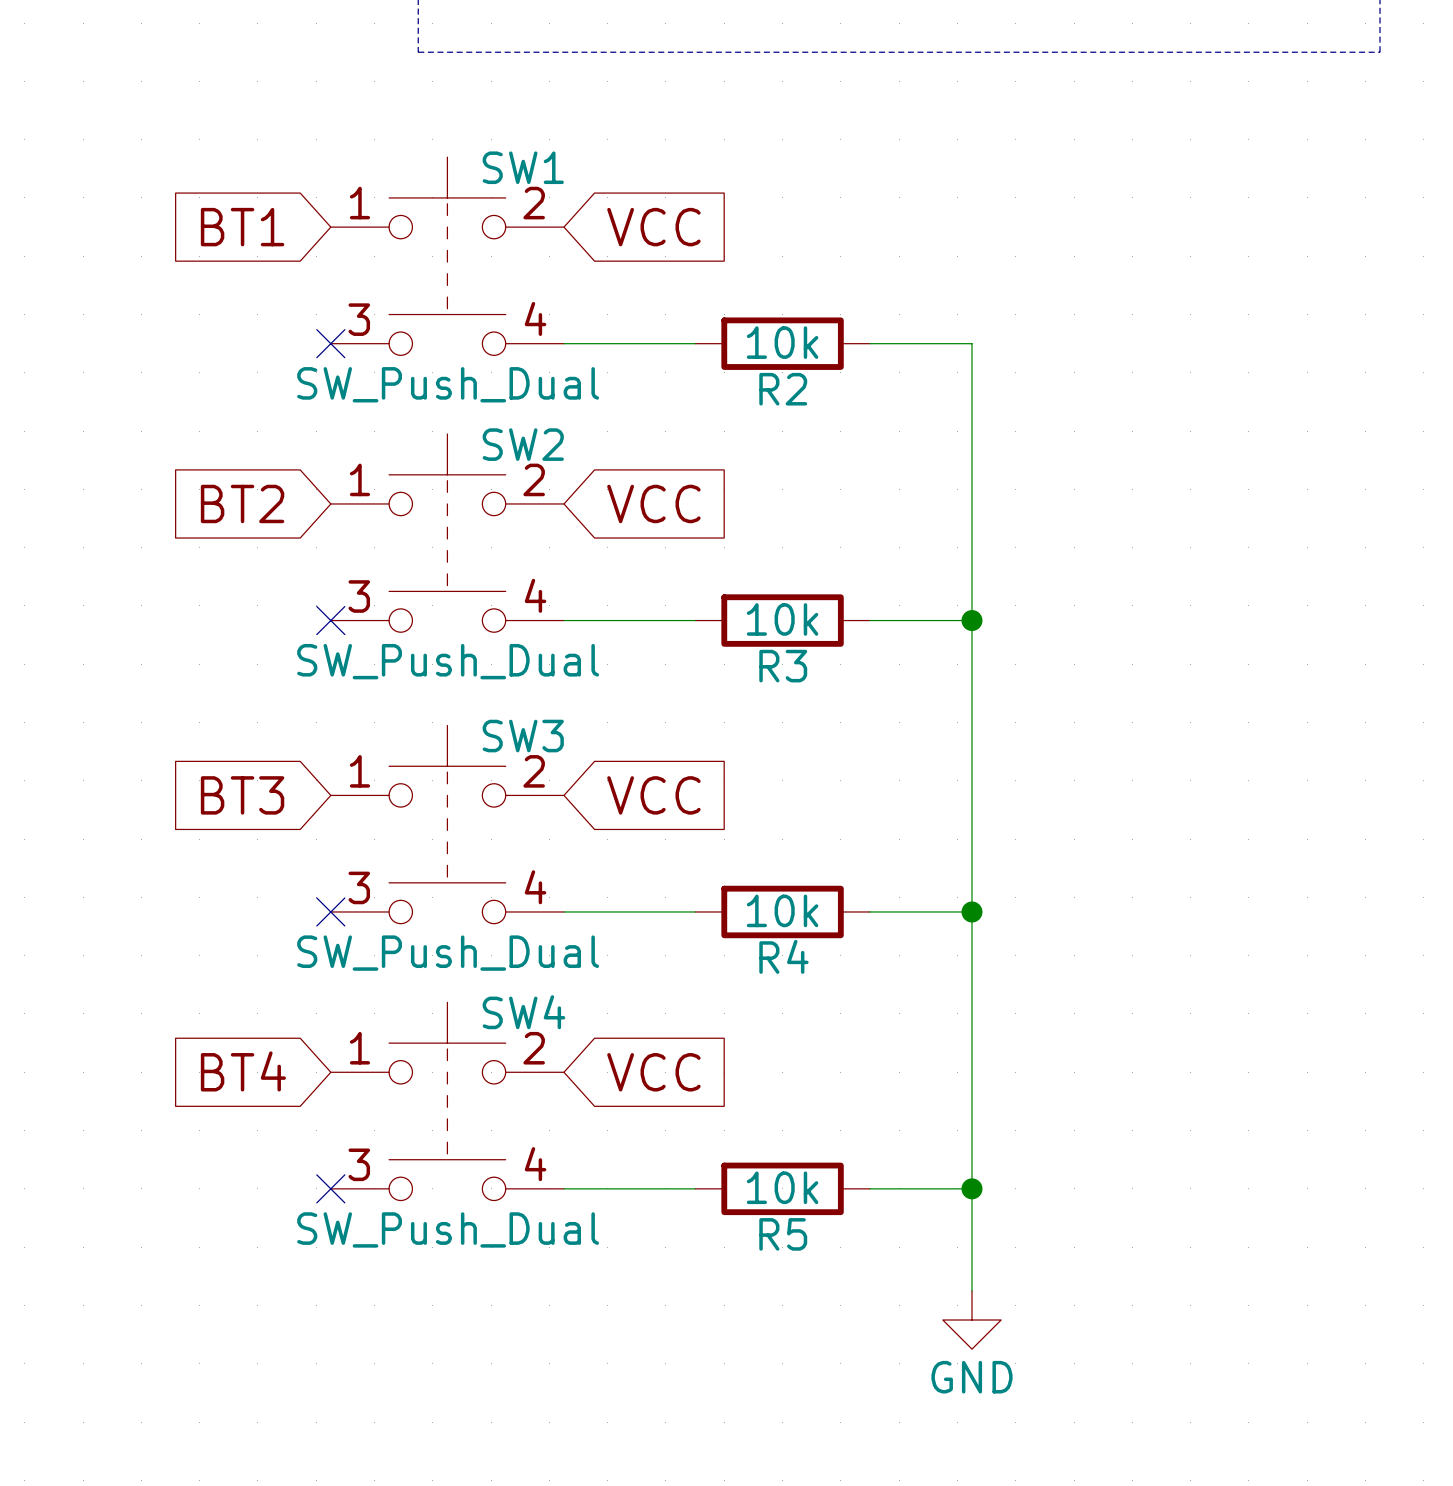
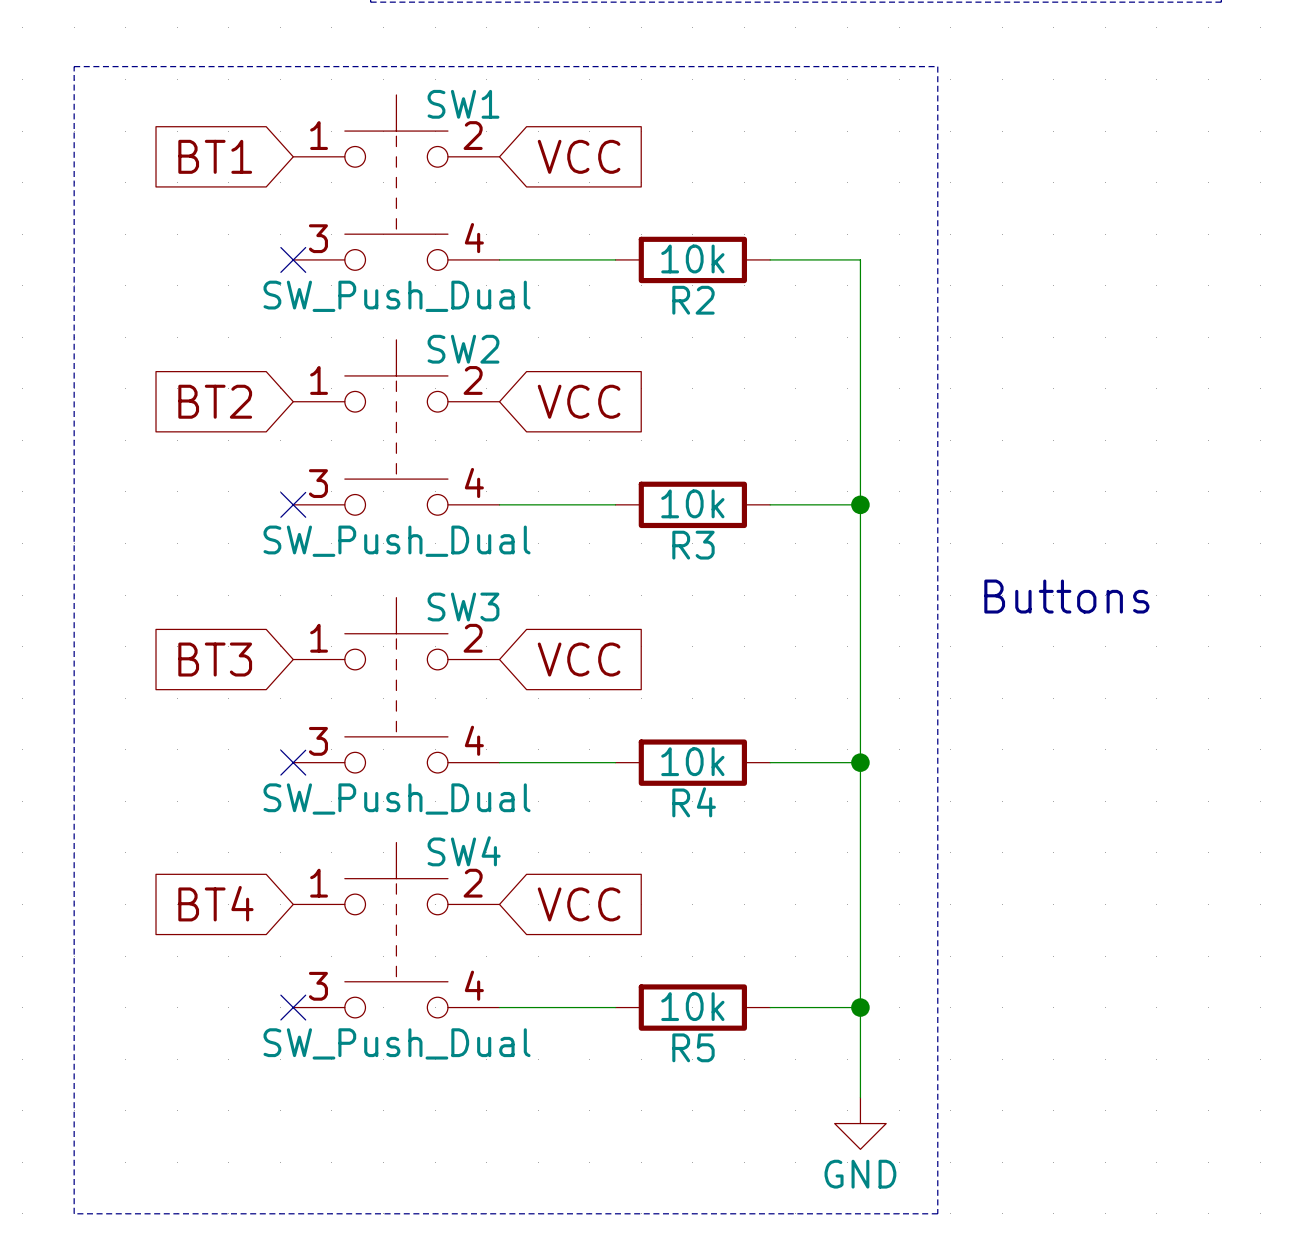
line: none -> (74, 66) (937, 66) (937, 1213) (74, 1213) (74, 66)
text: none -> Buttons (1066, 596)

